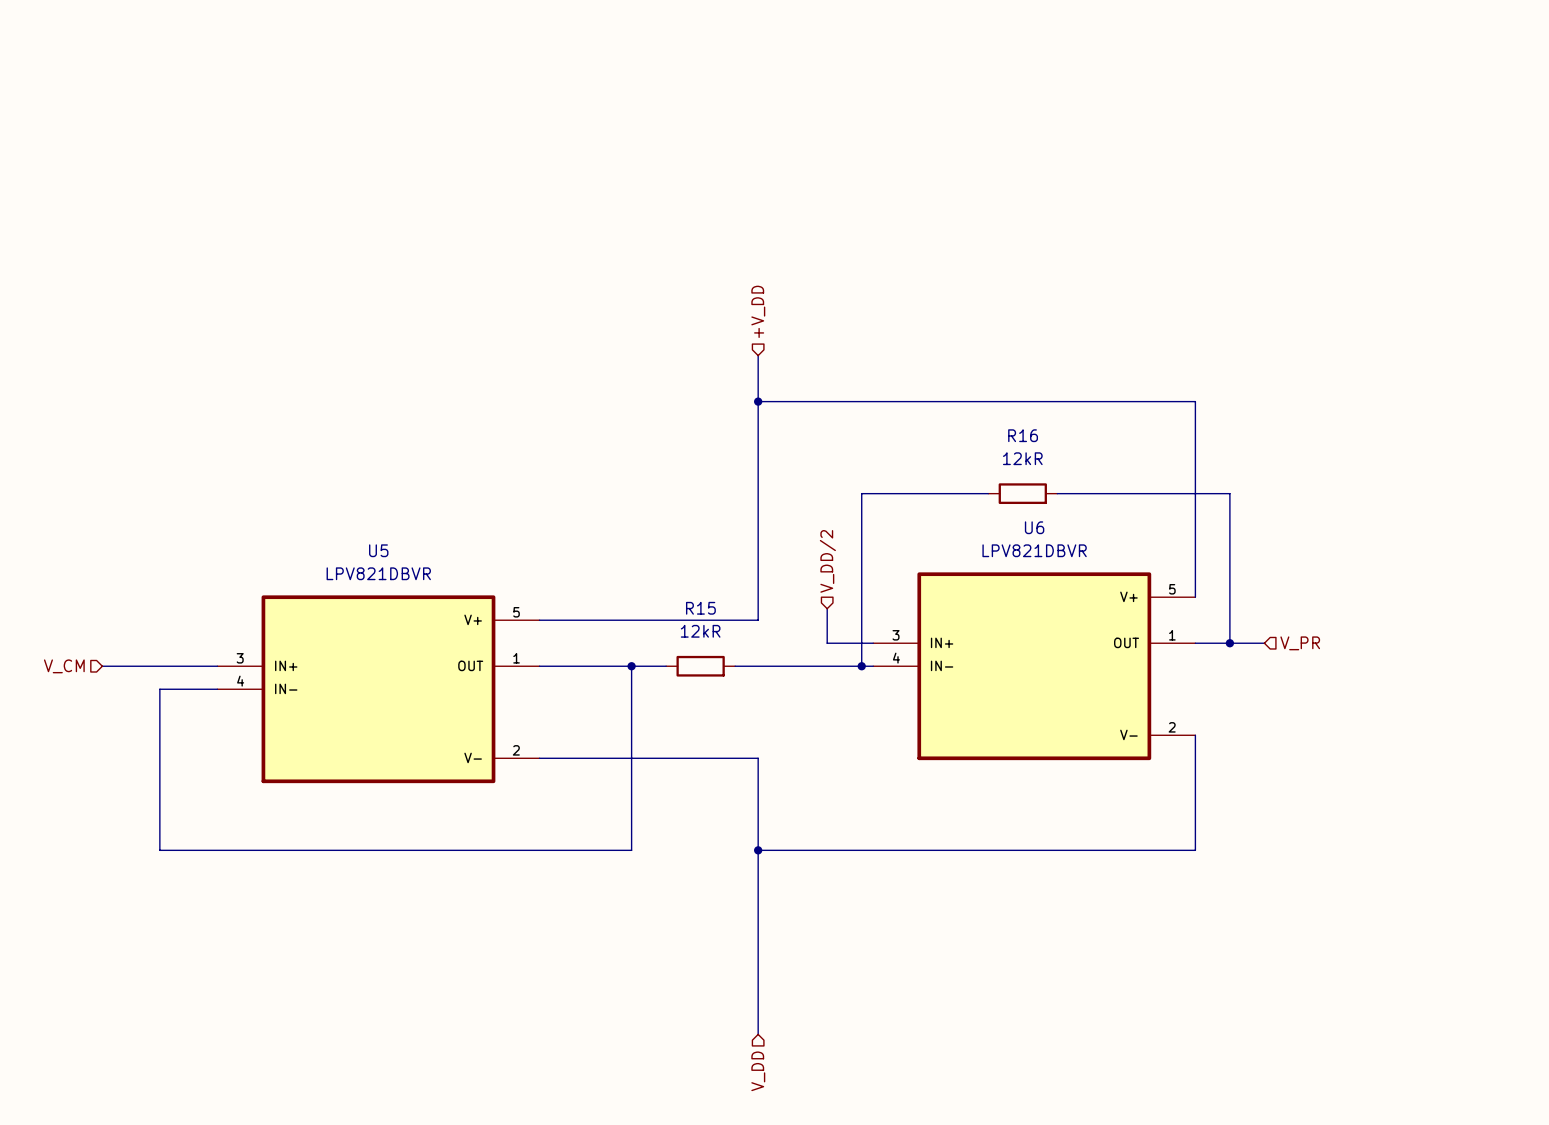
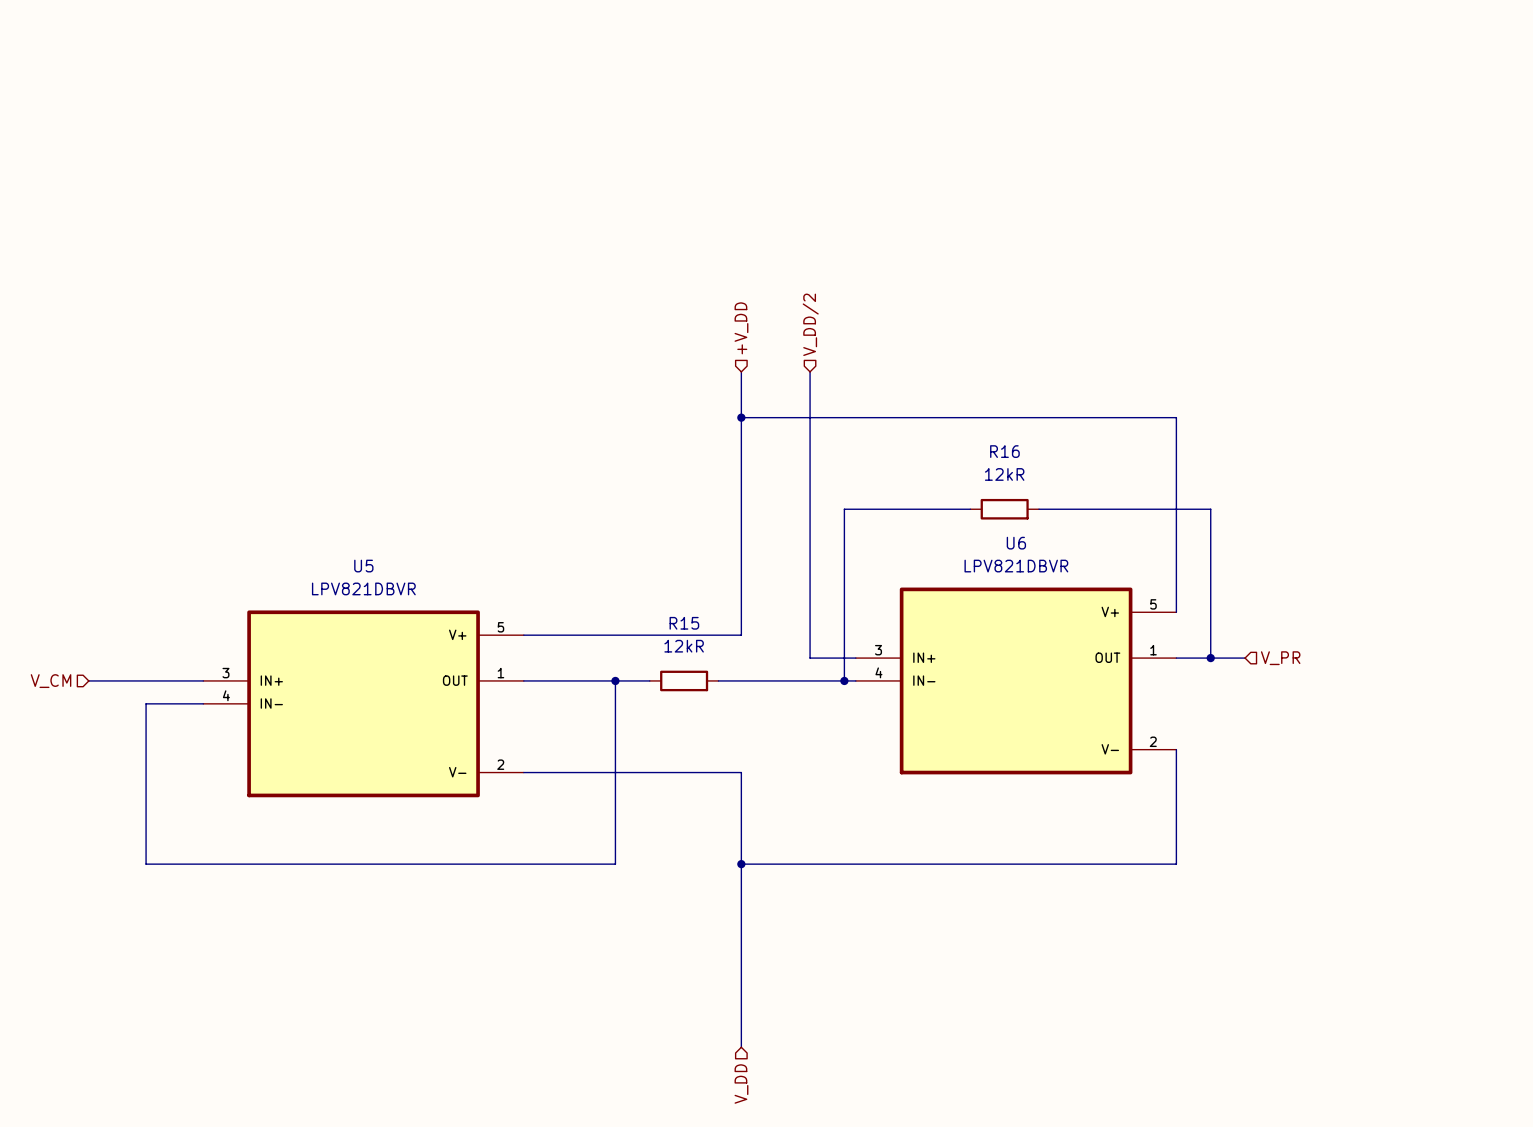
hierarchical label: none -> V_DD/2 (810, 324)
wire: none -> (810, 371) (810, 623)
hierarchical label: V_DD/2 (827, 561) -> none

